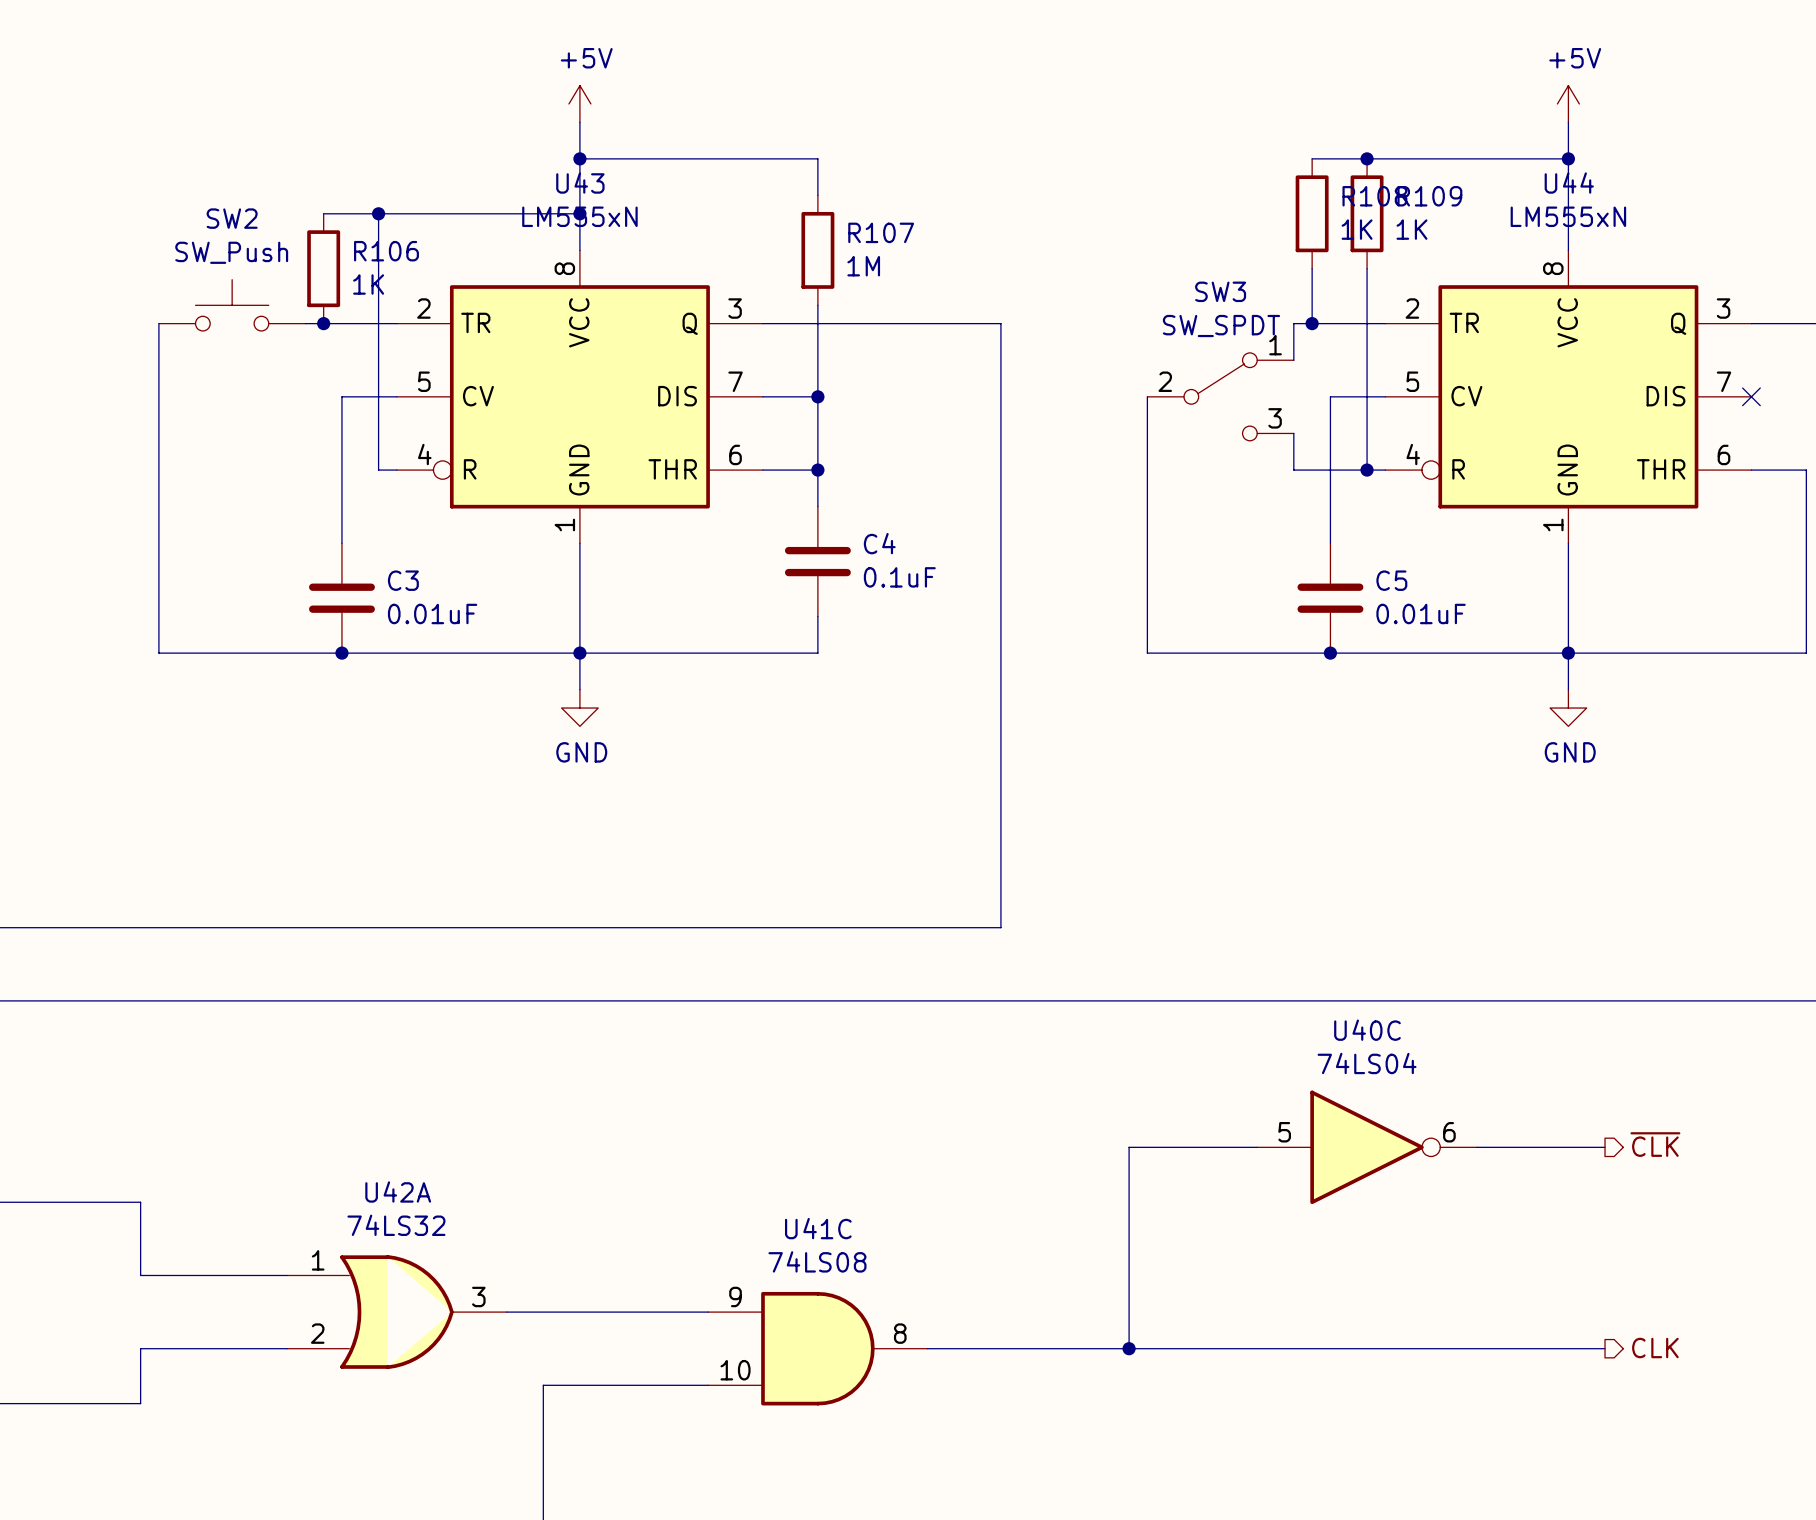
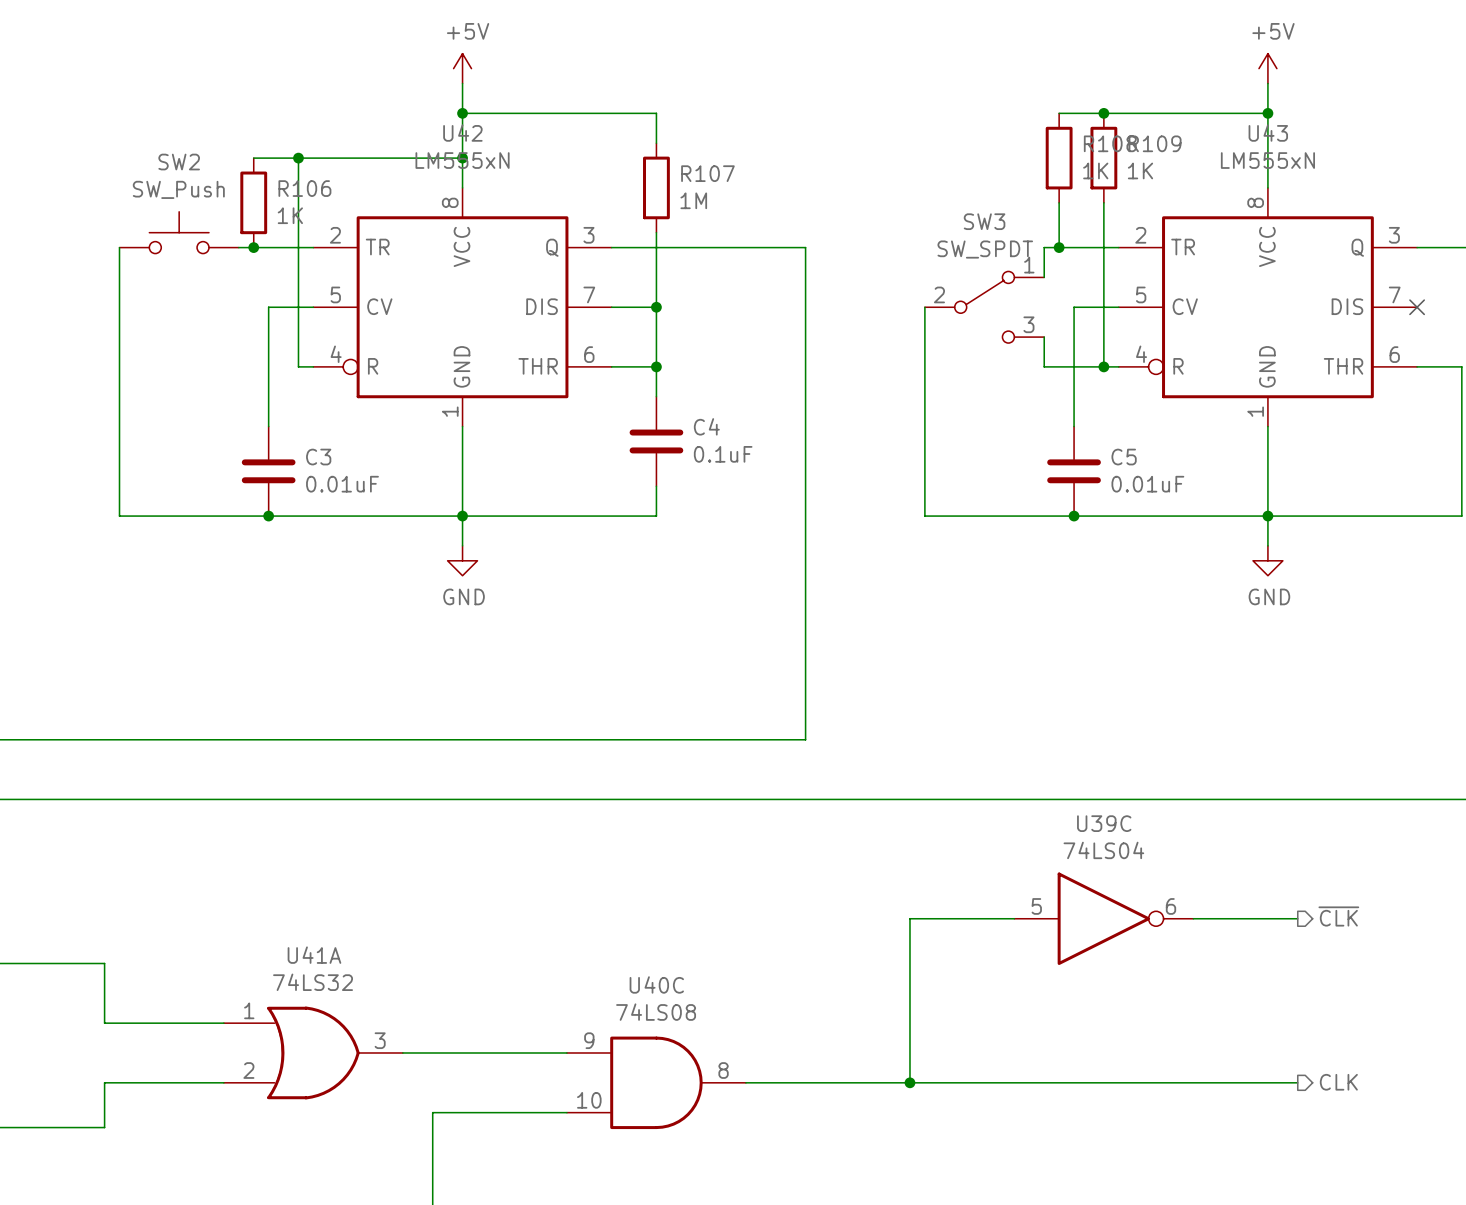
U43 name: U43 (580, 183) -> U42 (462, 133)
U44 name: U44 (1569, 183) -> U43 (1268, 133)
U40C name: U40C (1367, 1030) -> U39C (1104, 823)
U42A name: U42A (398, 1191) -> U41A (314, 955)
U41C name: U41C (818, 1228) -> U40C (656, 984)

